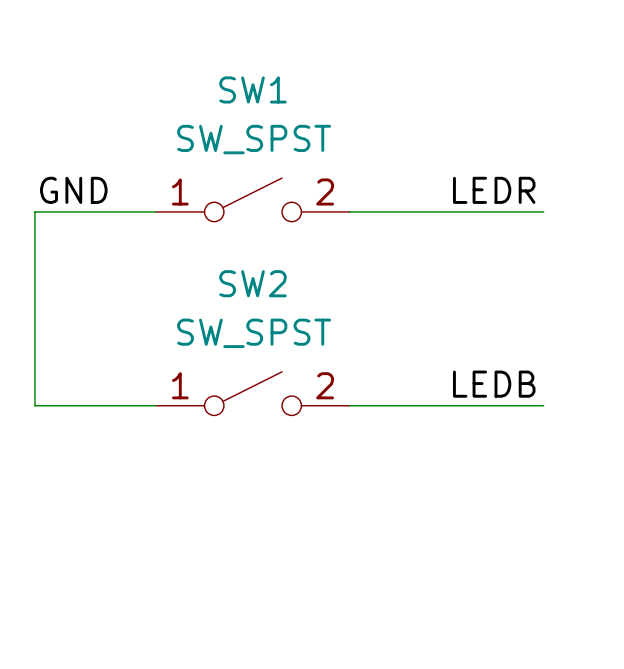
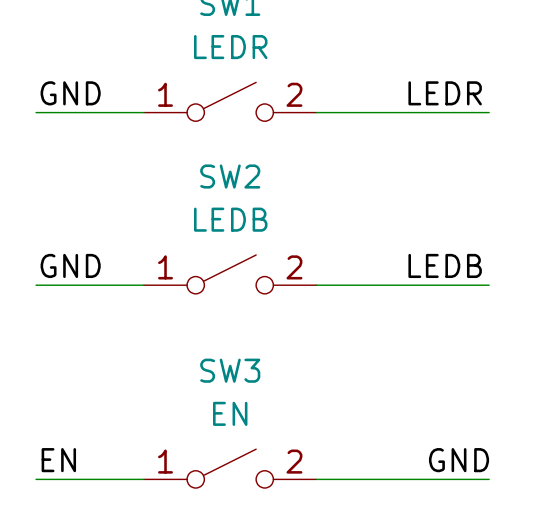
SW1 value: SW_SPST (254, 139) -> LEDR (230, 47)
wire: (34, 211) (34, 405) -> none
SW2 value: SW_SPST (254, 333) -> LEDB (230, 219)
label: none -> GND (70, 265)
label: none -> EN (58, 460)
label: none -> GND (459, 460)
SW3: none -> EN (230, 468)
wire: none -> (36, 479) (143, 479)
wire: none -> (316, 479) (489, 479)

